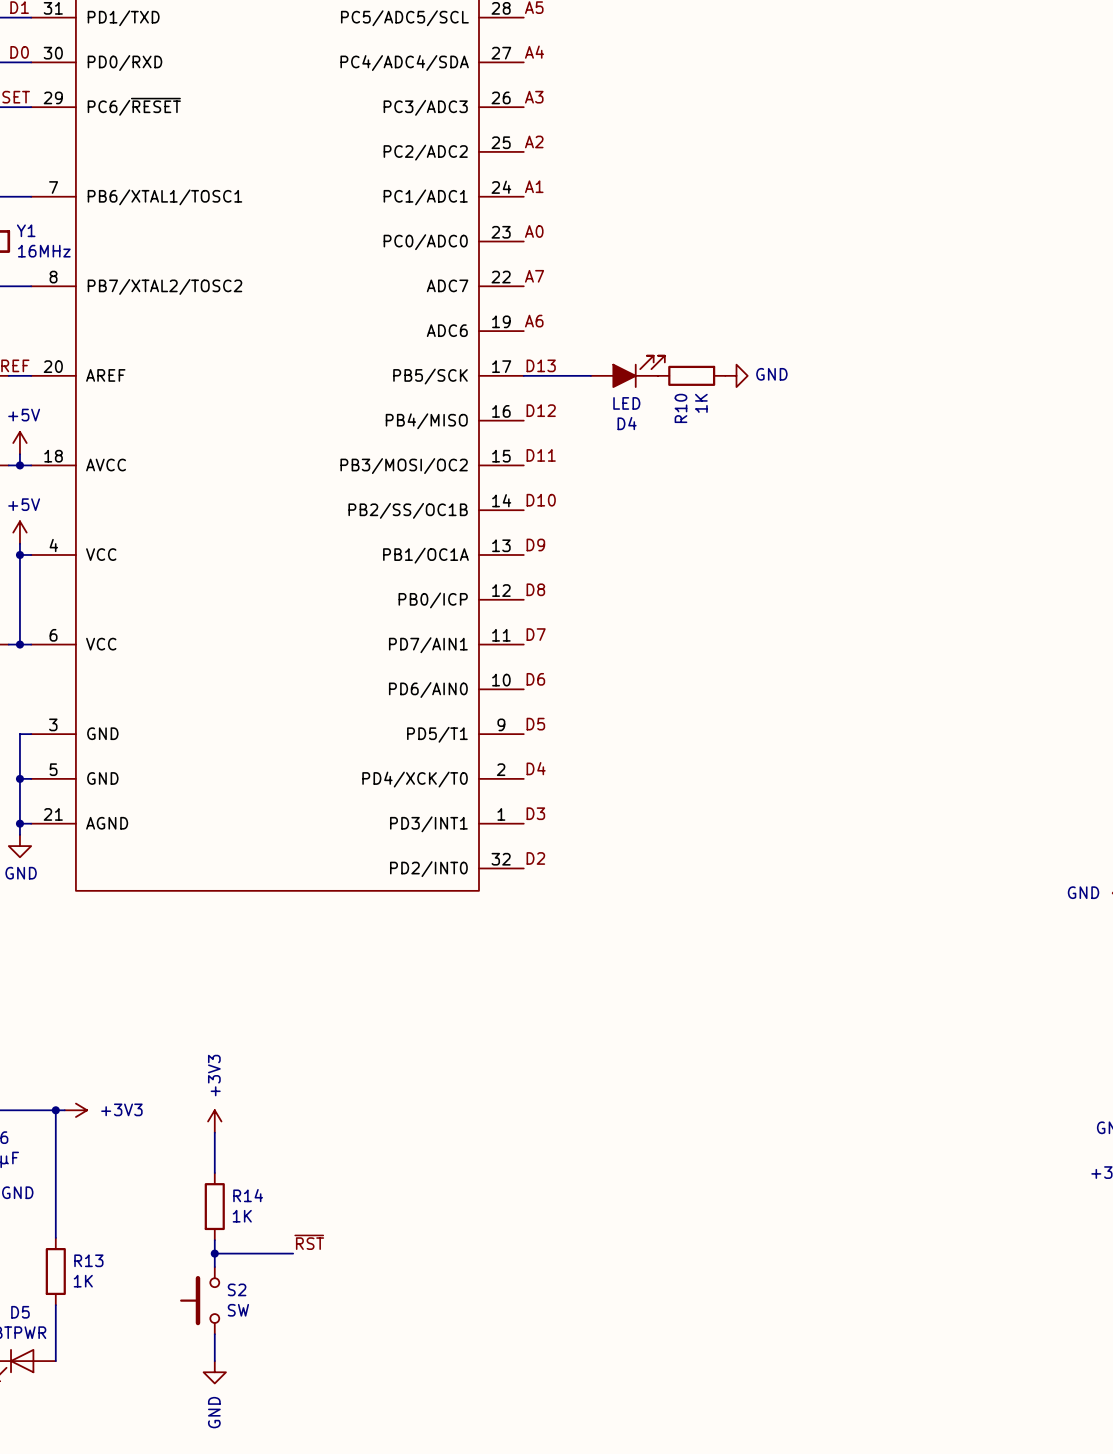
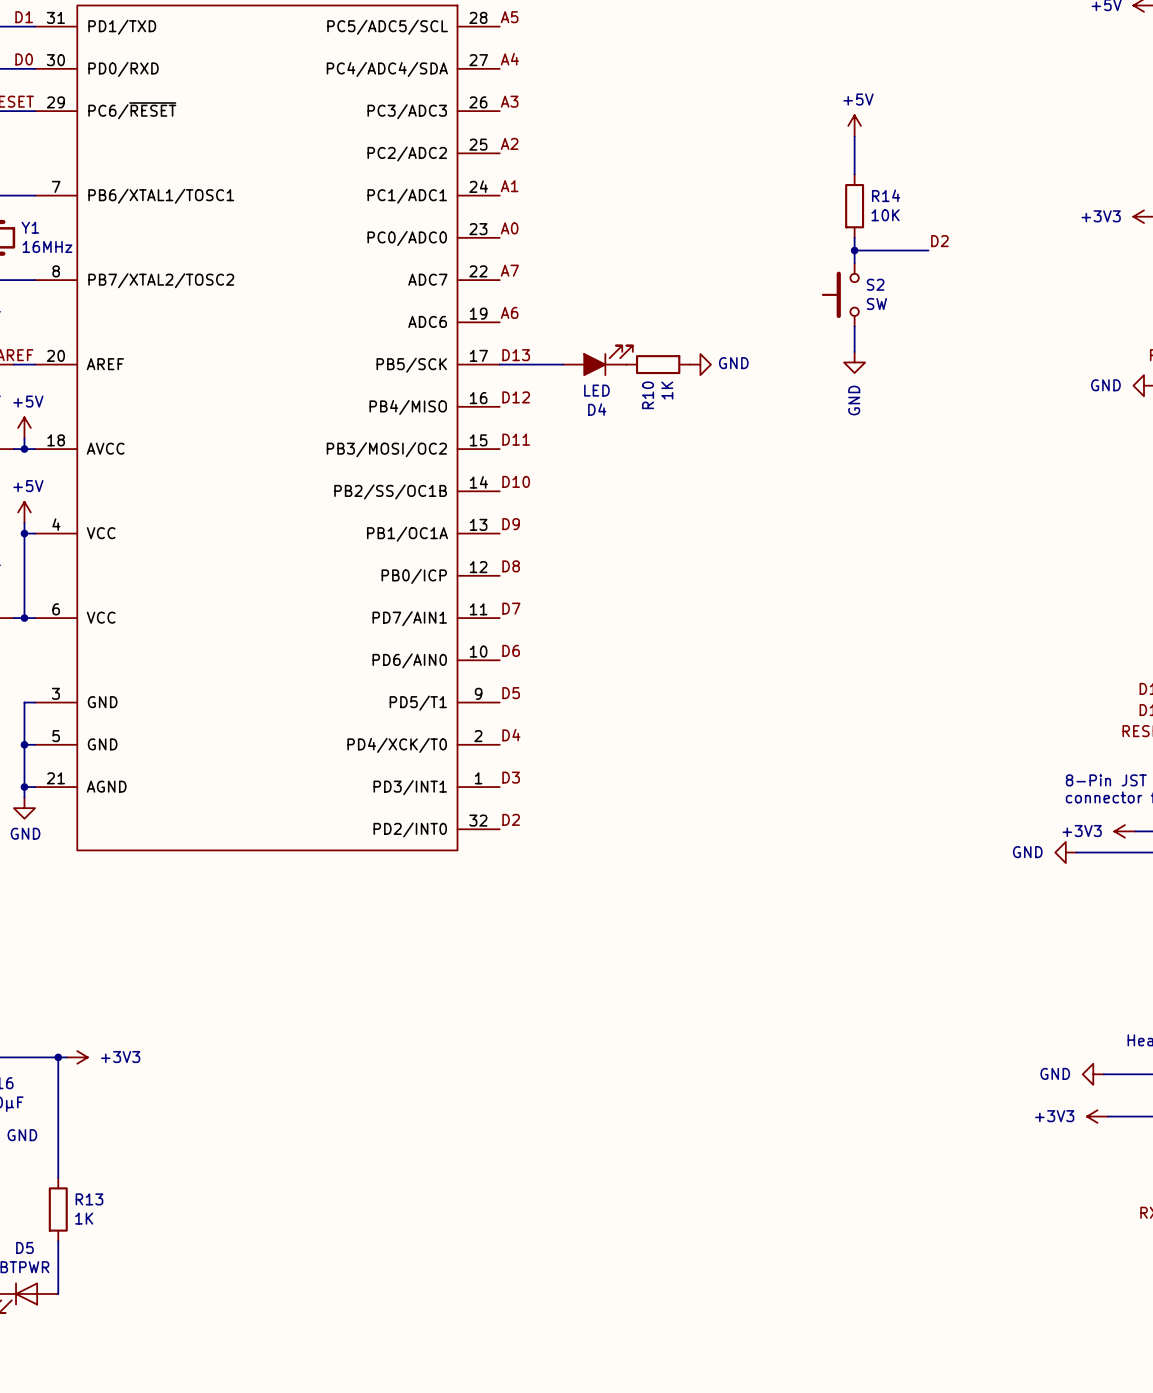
power symbol: none -> +5V (854, 125)
wire: none -> (854, 136) (854, 174)
wire: none -> (854, 237) (854, 263)
label: none -> D2 (939, 241)
wire: none -> (854, 250) (928, 250)
junction: none -> (854, 250)
wire: none -> (854, 326) (854, 351)
power symbol: none -> GND (854, 362)
power symbol: +3V3 (214, 1121) -> none
wire: (214, 1132) (214, 1172) -> none
R14 position: (214, 1206) -> (854, 206)
R14 value: 1K (242, 1216) -> 10K (885, 215)
wire: (214, 1240) (214, 1267) -> none
label: ~{RST} (309, 1242) -> none
wire: (214, 1253) (293, 1253) -> none
junction: (214, 1253) -> none
S2 position: (199, 1300) -> (840, 294)
wire: (214, 1334) (214, 1361) -> none
power symbol: GND (214, 1372) -> none

